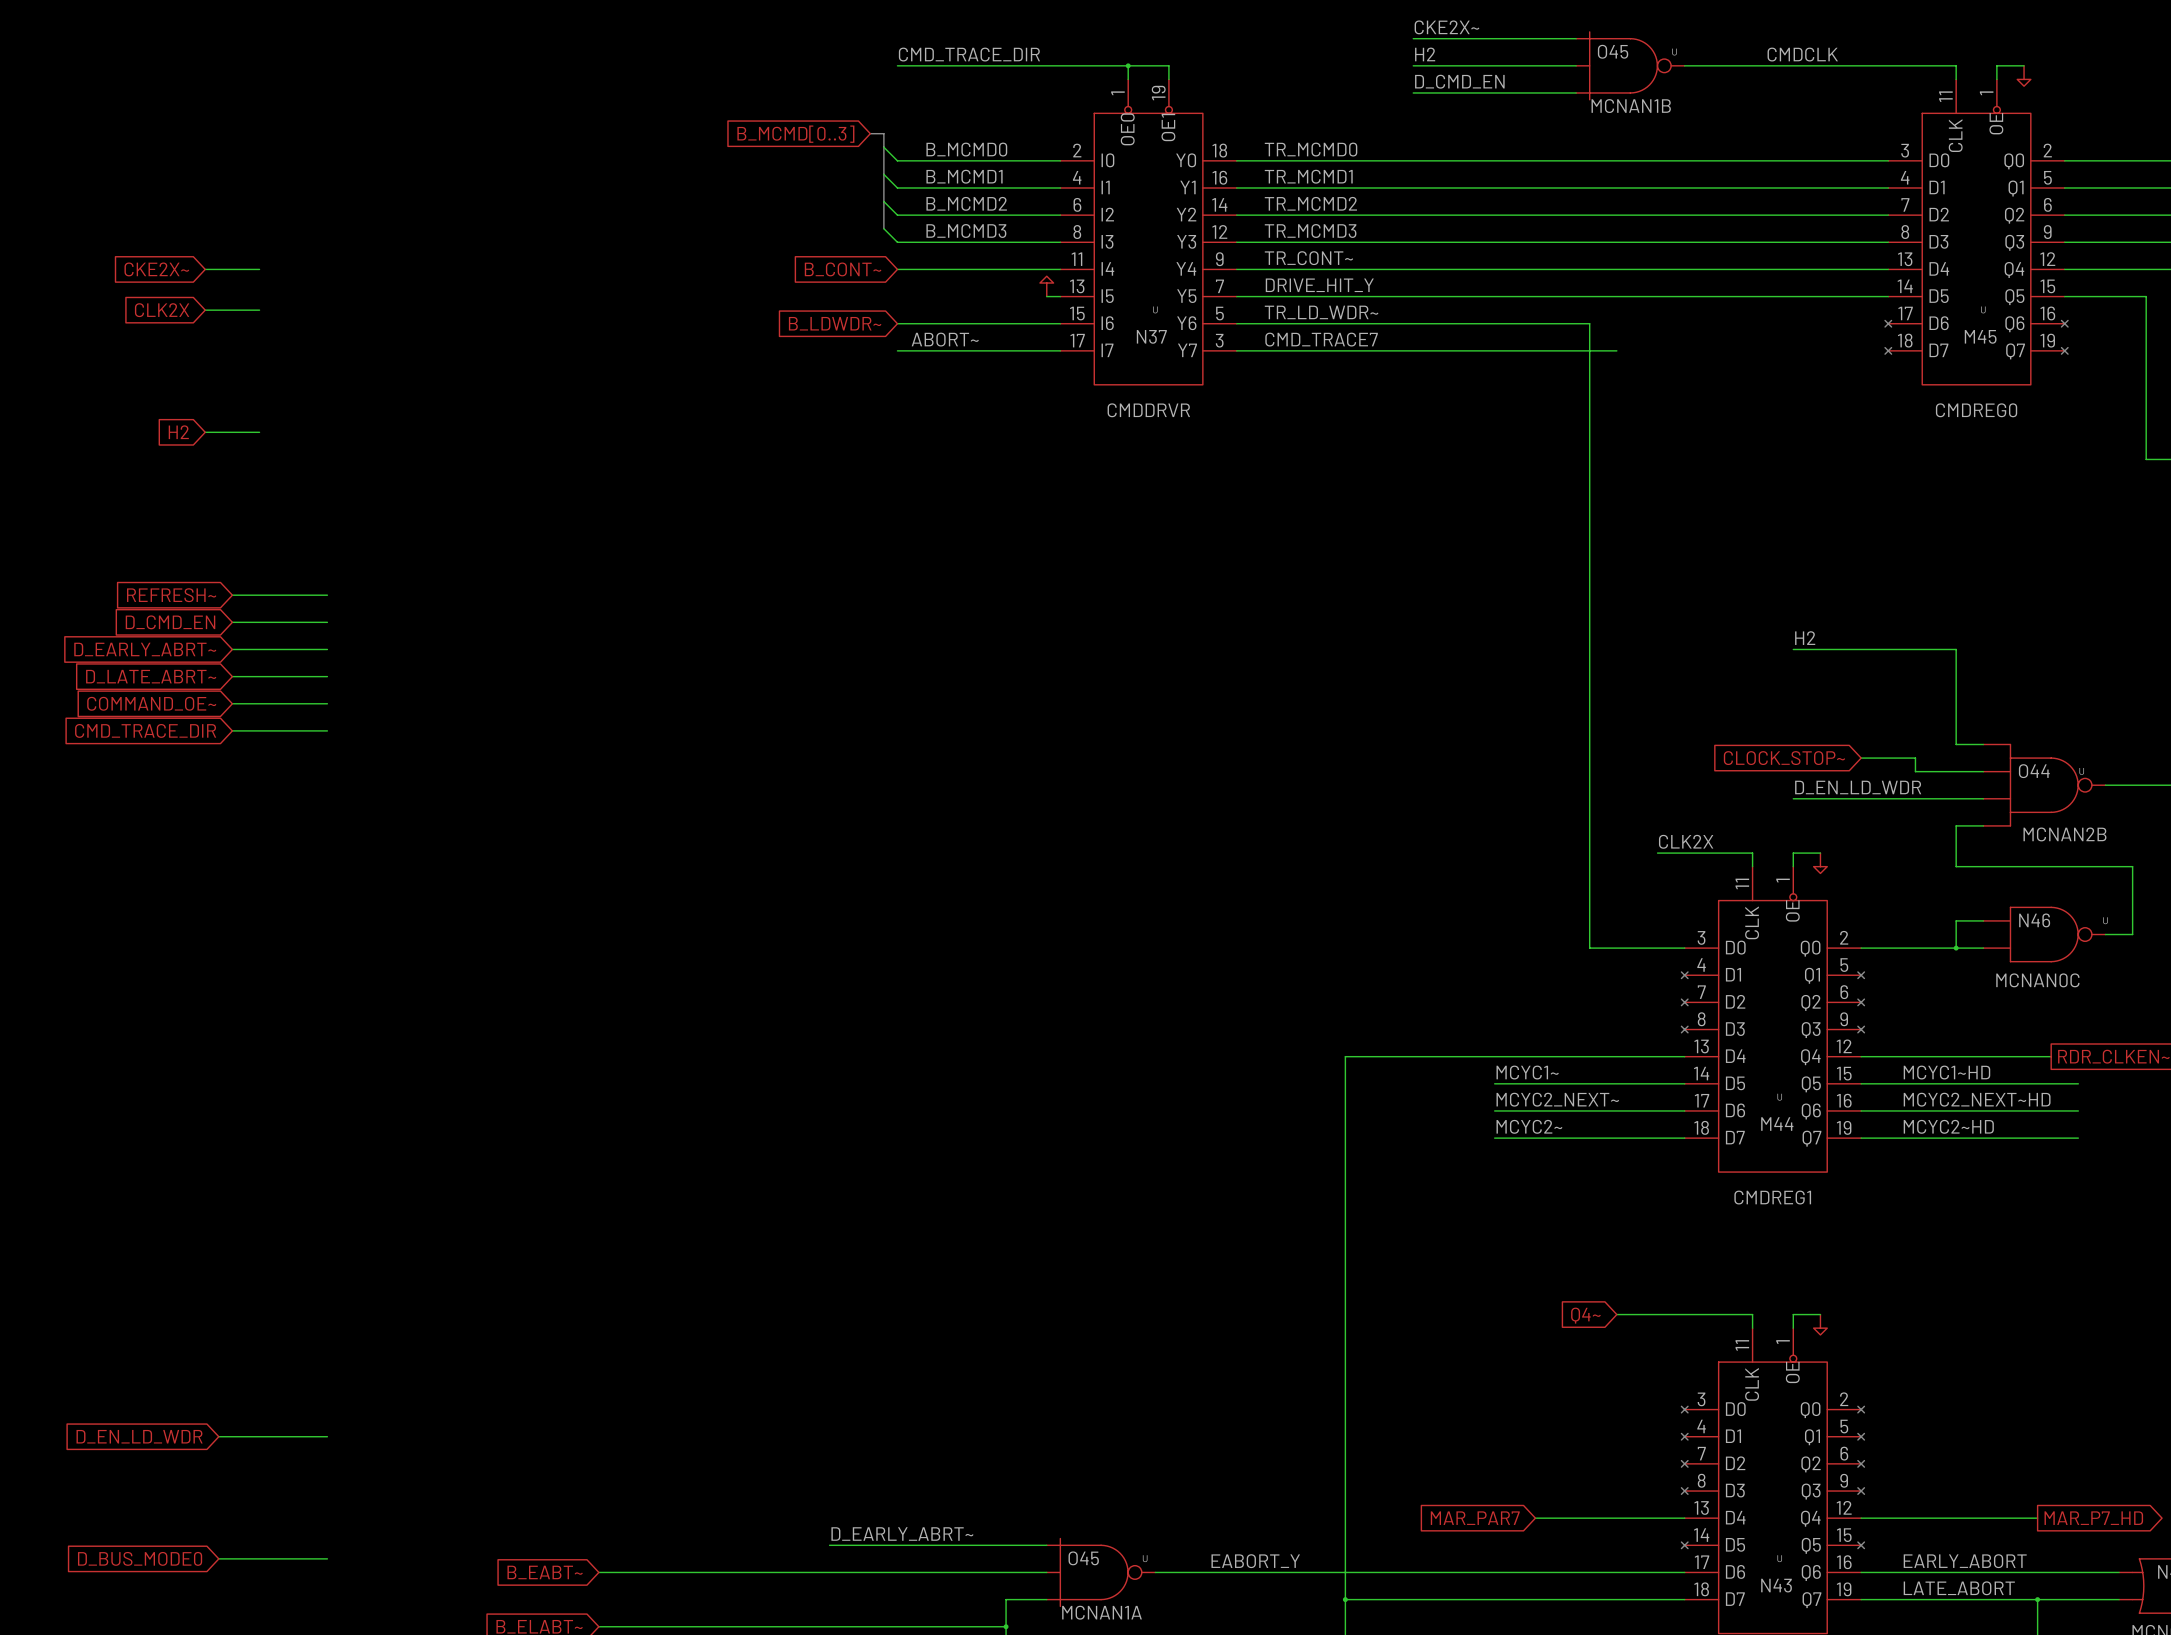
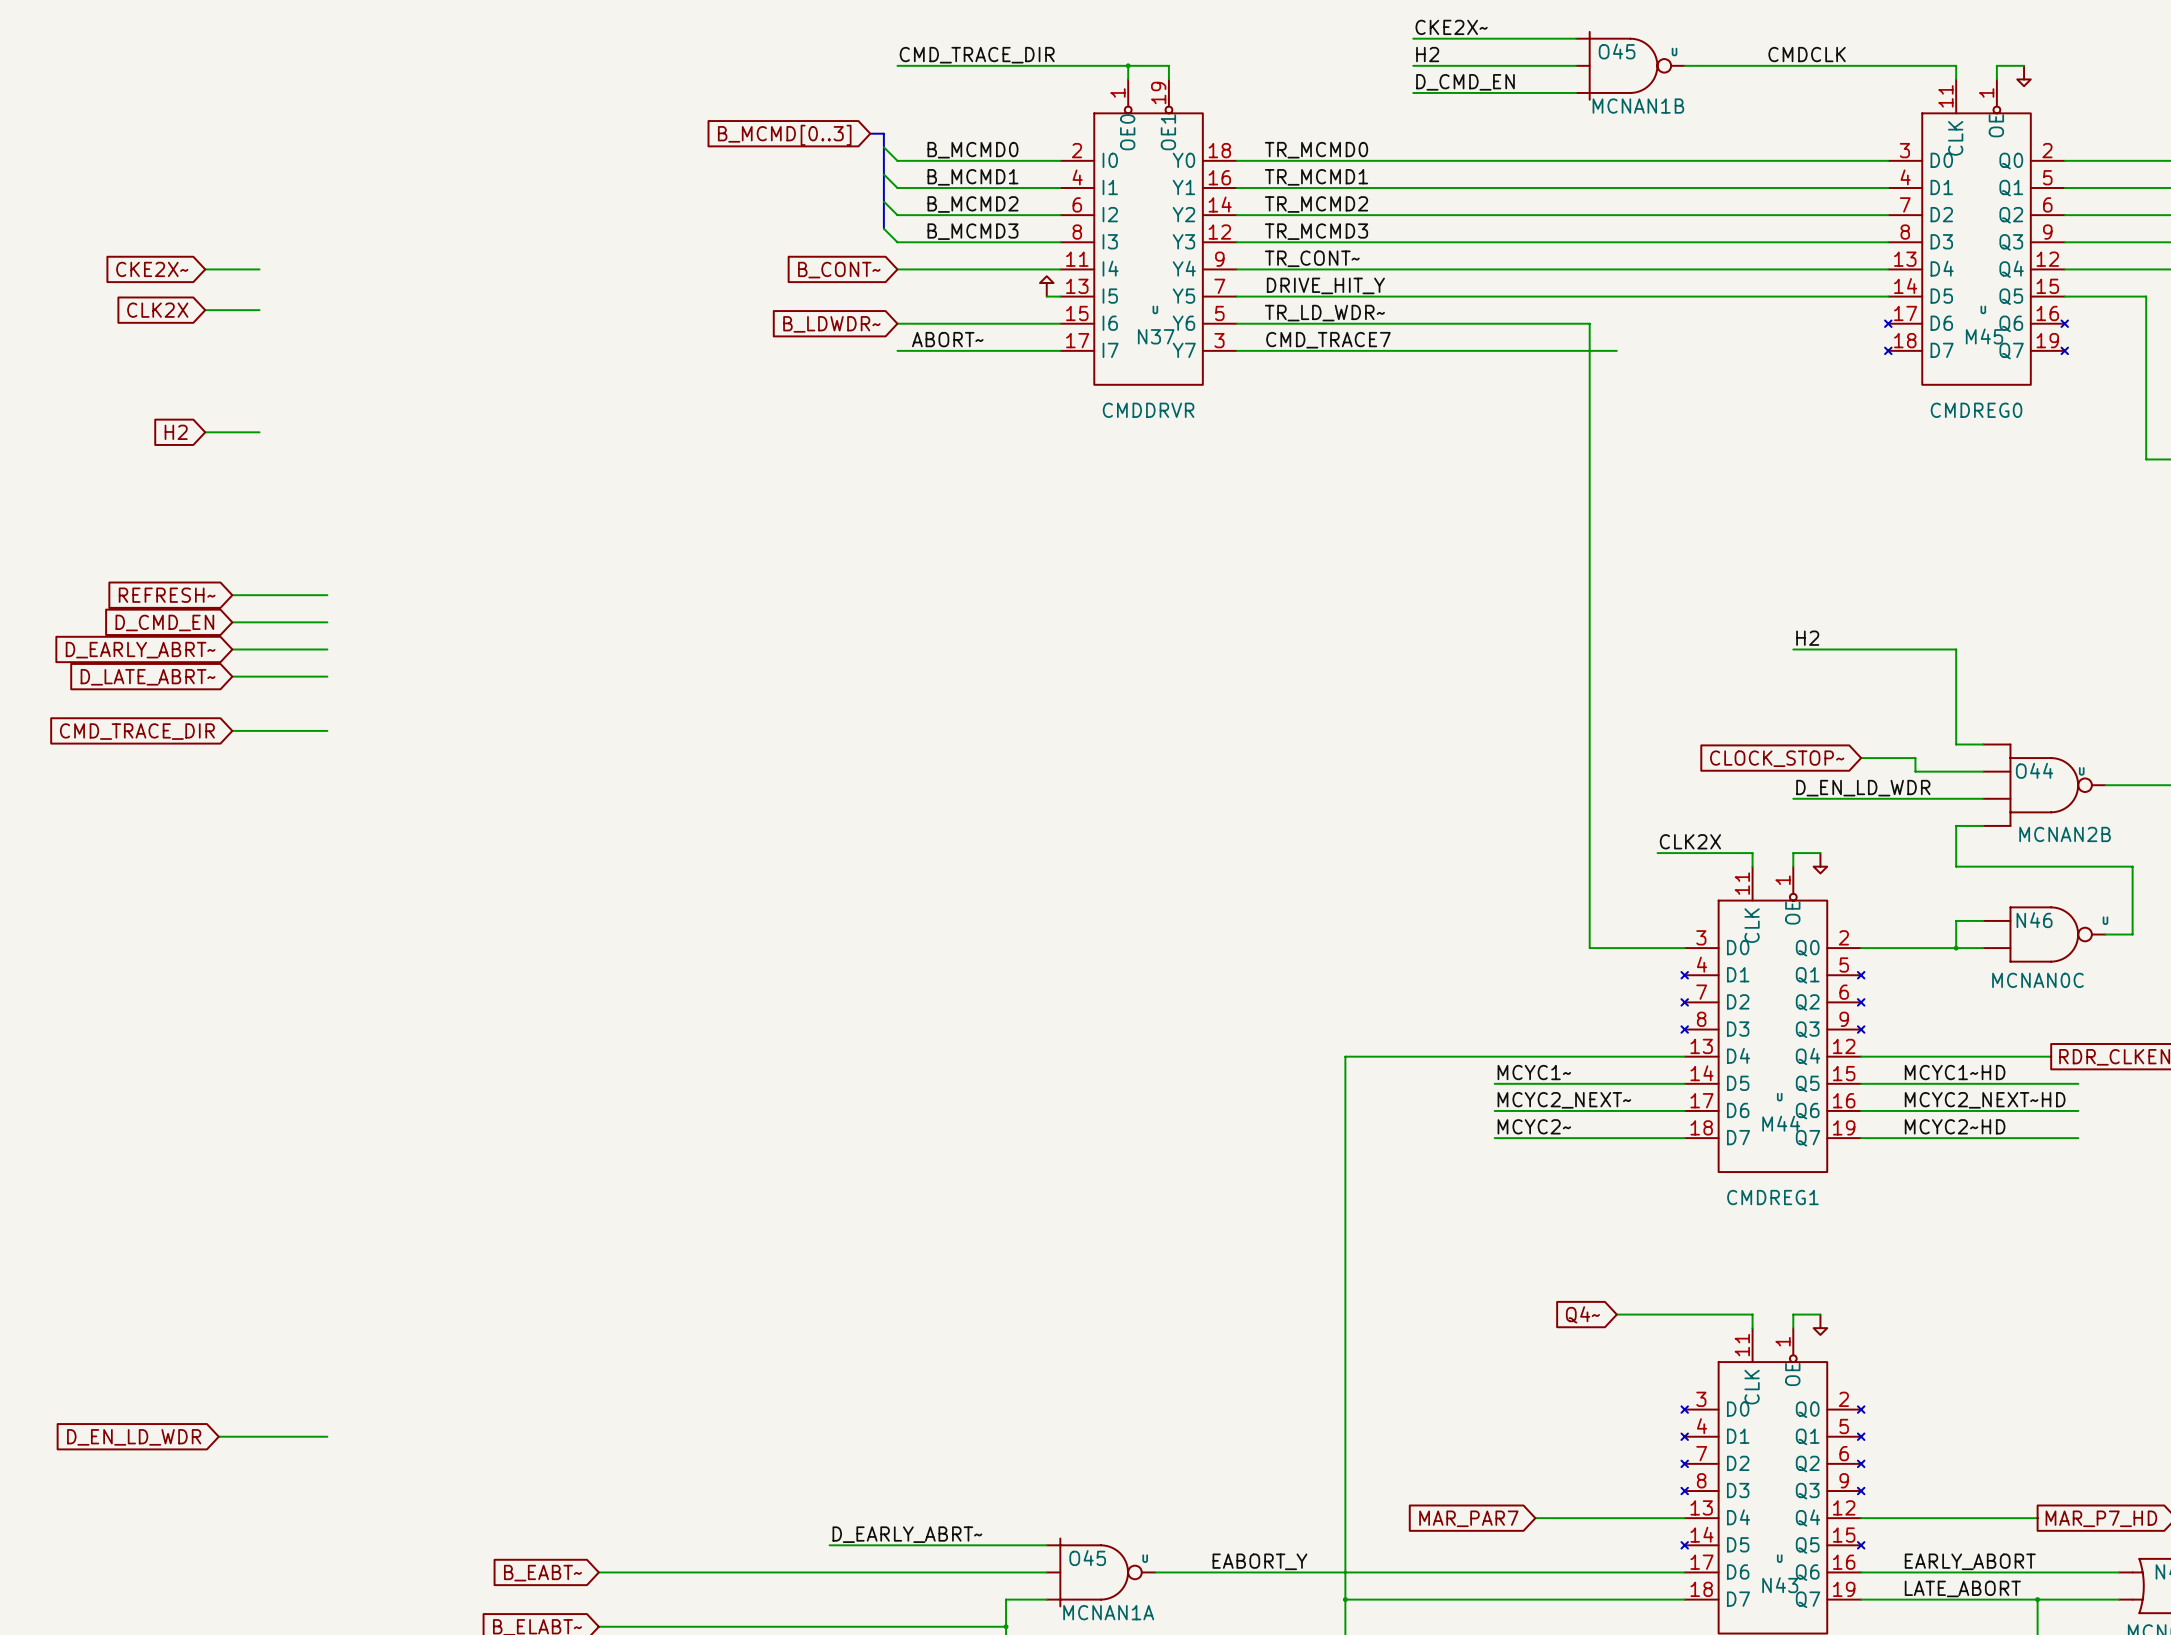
global label: COMMAND_OE~ (151, 703) -> none
wire: (232, 703) (327, 703) -> none
global label: D_BUS_MODE0 (140, 1558) -> none
wire: (218, 1558) (327, 1558) -> none

